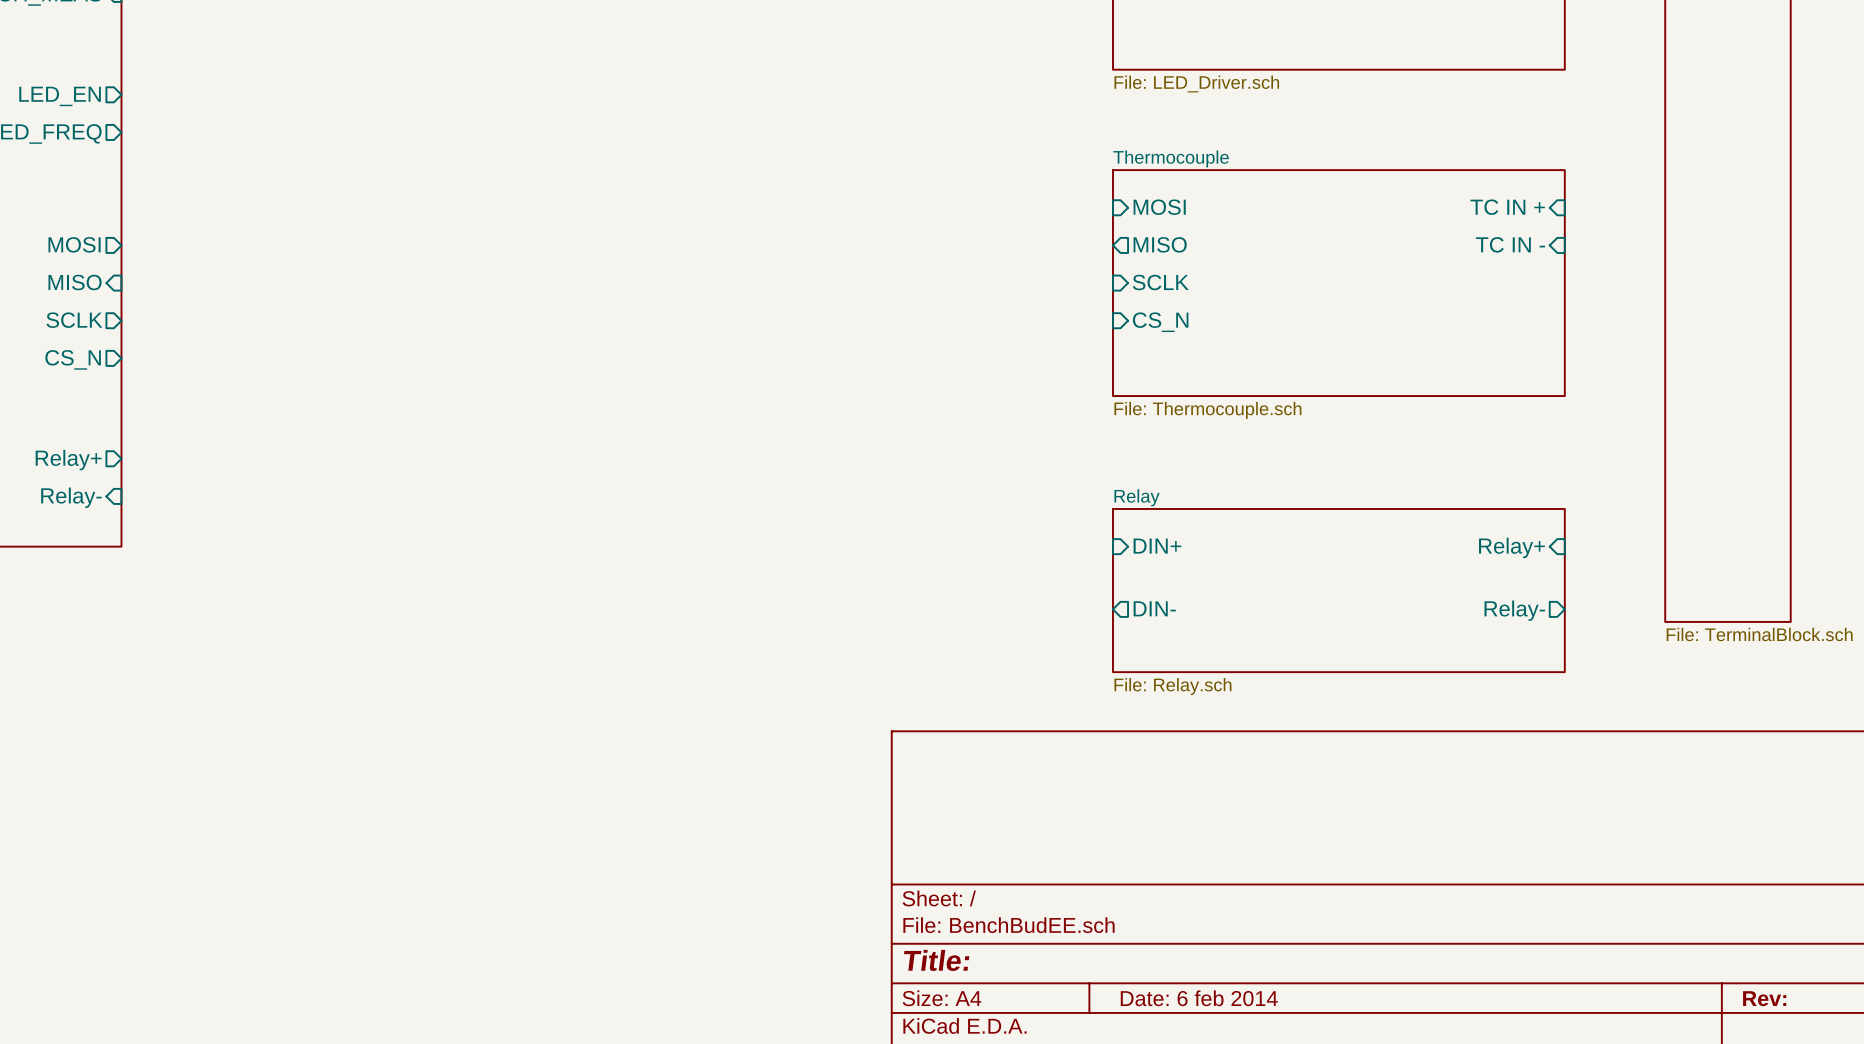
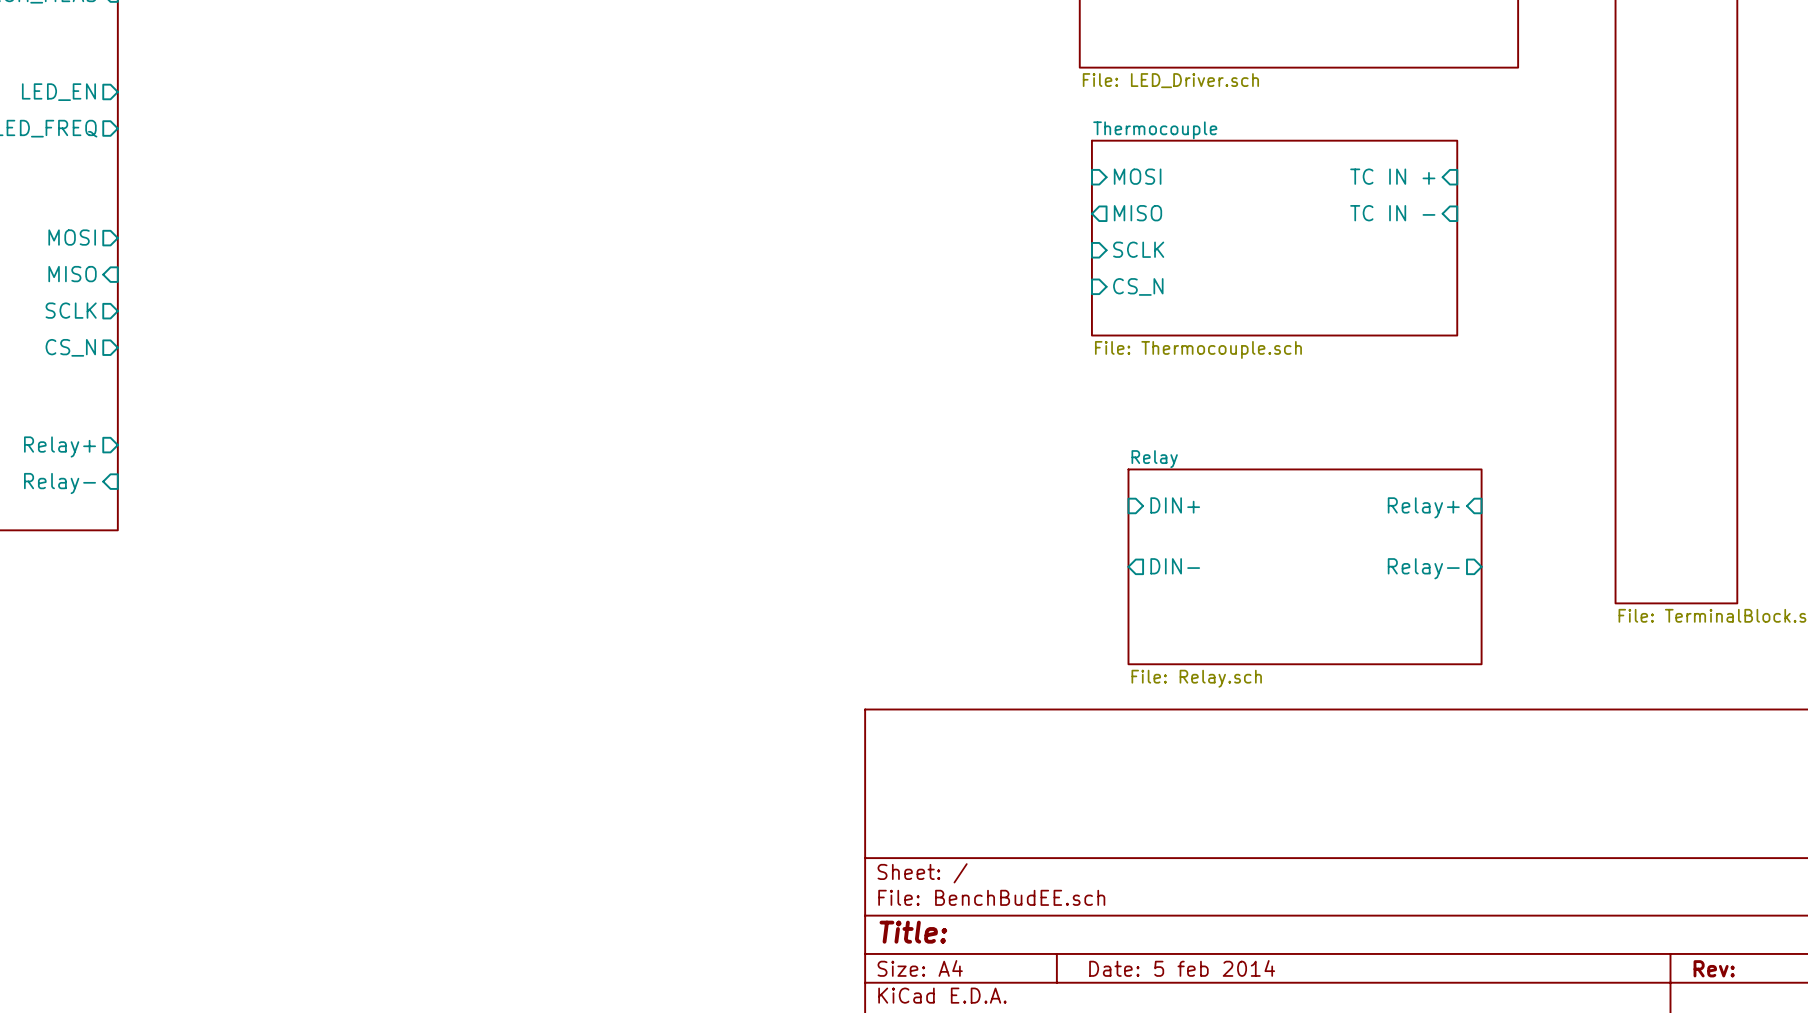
sheet pin position: MOSI (1159, 207) -> MOSI (1137, 176)
sheet pin position: TC IN + (1507, 207) -> TC IN + (1392, 176)
sheet pin position: MISO (1160, 244) -> MISO (1137, 213)
sheet pin position: TC IN - (1510, 244) -> TC IN - (1392, 213)
sheet Thermocouple: none -> File: Thermocouple.sch (1274, 238)
sheet pin position: SCLK (1160, 282) -> SCLK (1138, 249)
sheet Thermocouple: File: Thermocouple.sch (1338, 283) -> none
sheet pin position: CS_N (1160, 322) -> CS_N (1138, 286)
sheet Relay name position: Relay (1137, 497) -> Relay (1154, 459)
sheet Relay shape: [1112, 508, 1565, 673] -> [1128, 469, 1482, 665]
sheet pin position: DIN+ (1157, 546) -> DIN+ (1175, 505)
sheet pin position: Relay+ (1511, 547) -> Relay+ (1423, 507)
sheet pin position: DIN- (1154, 608) -> DIN- (1175, 566)
sheet pin position: Relay- (1514, 610) -> Relay- (1423, 568)
sheet Relay value position: File: Relay.sch (1172, 686) -> File: Relay.sch (1196, 678)
title block: Date: 6 feb 2014 (1199, 998) -> Date: 5 feb 2014 (1182, 968)

